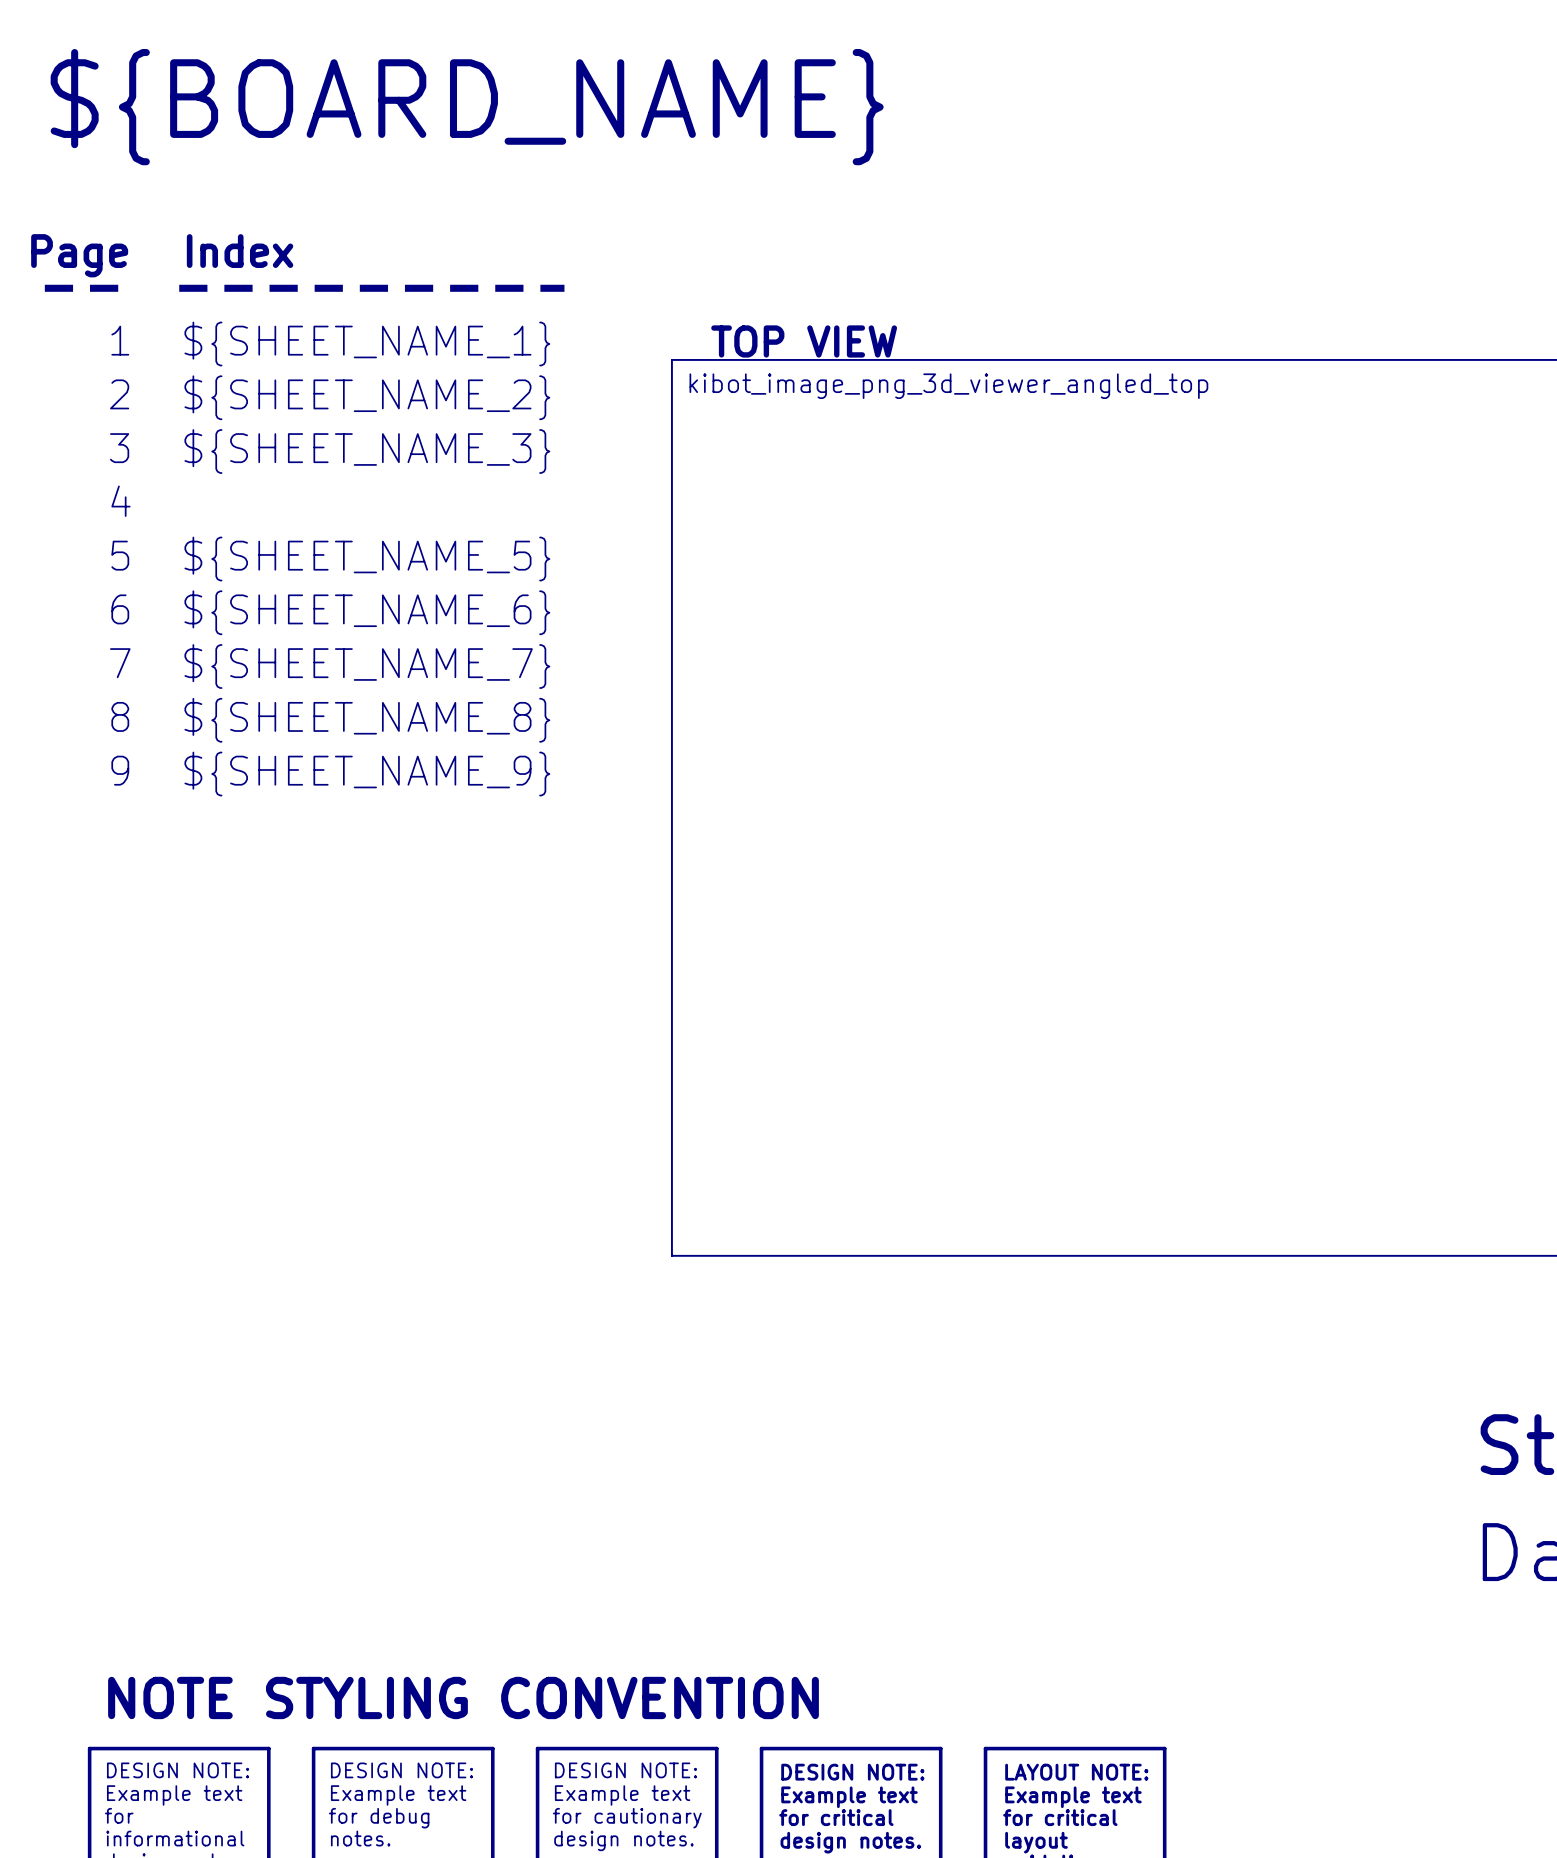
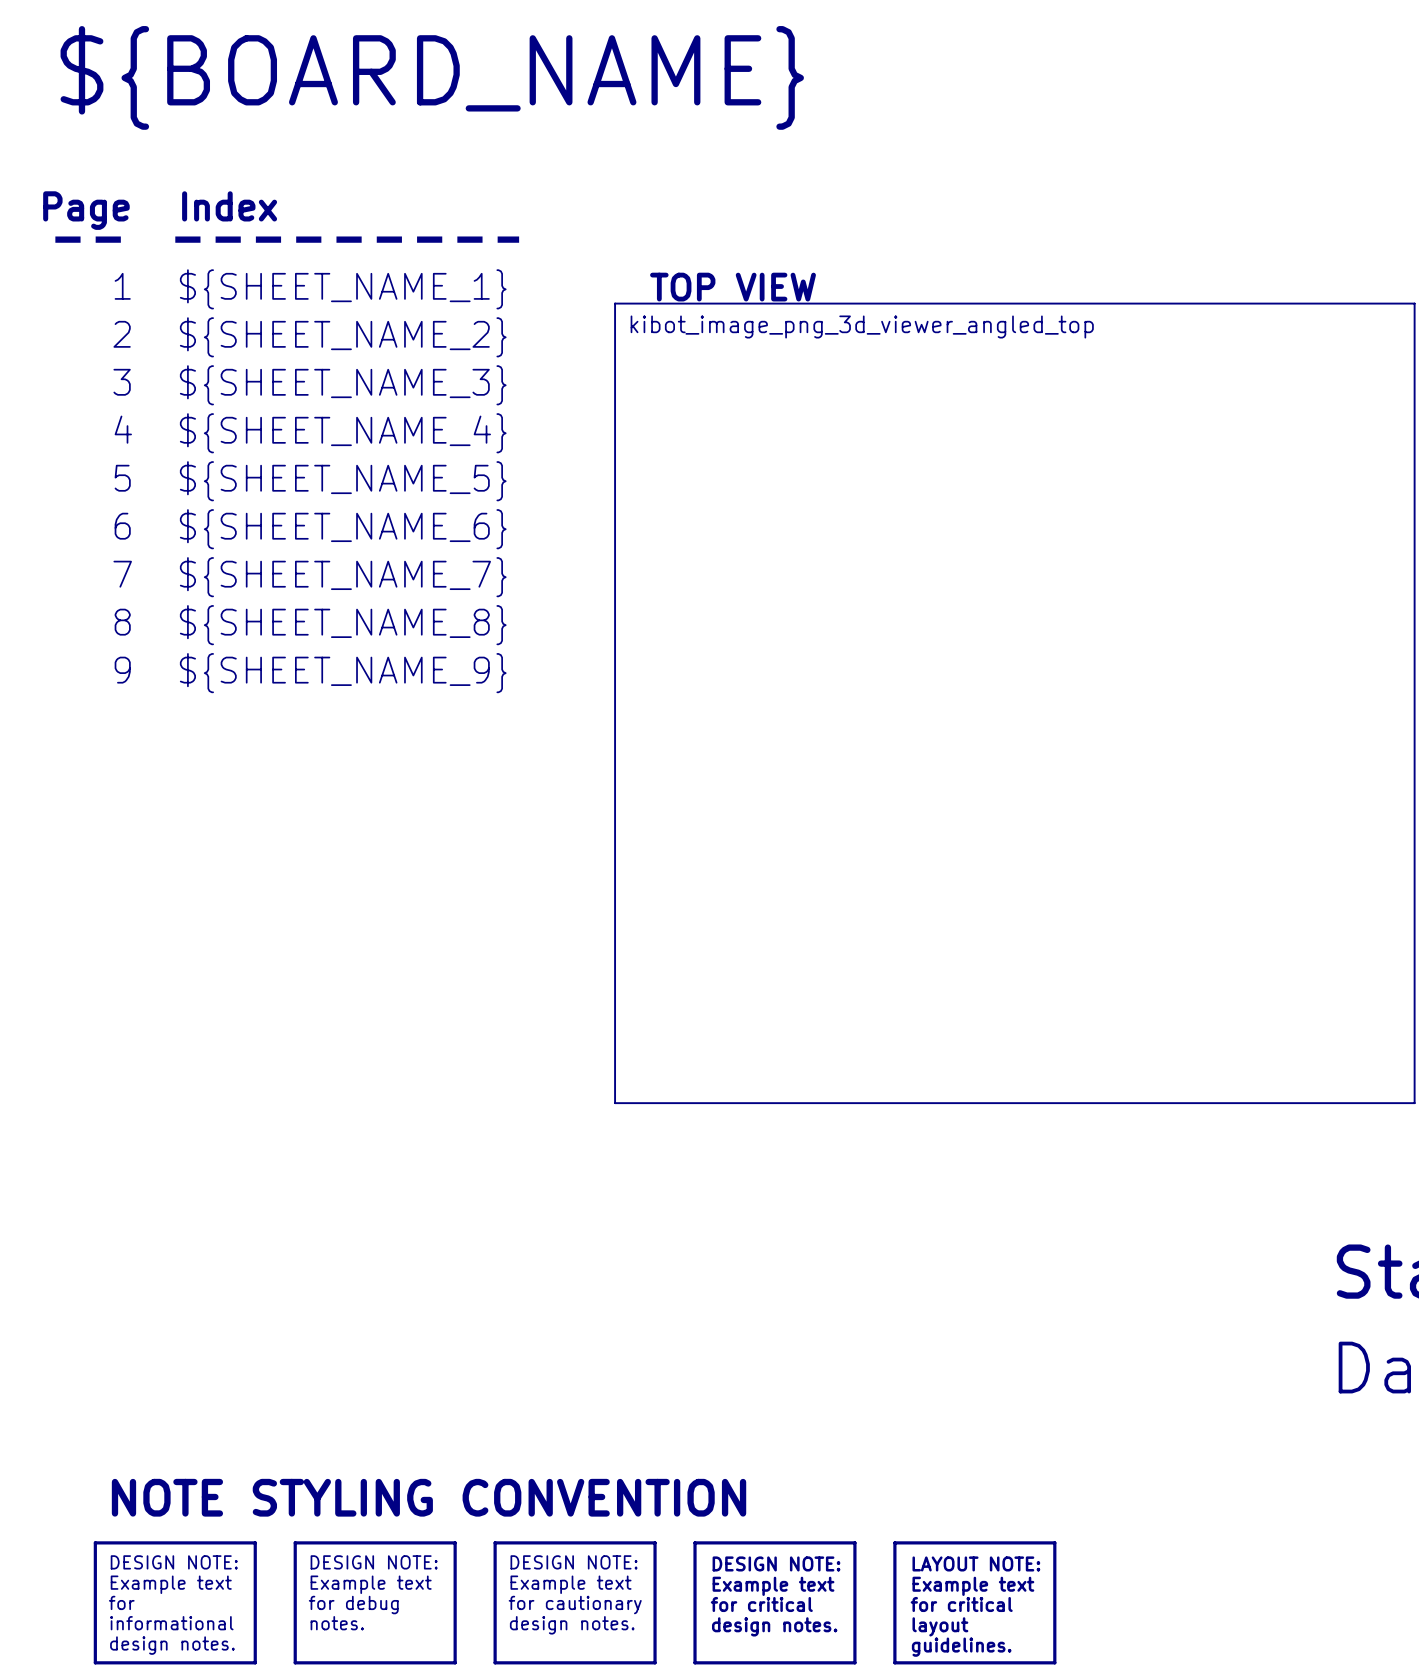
text: none -> ${SHEET_NAME_4} (343, 433)

